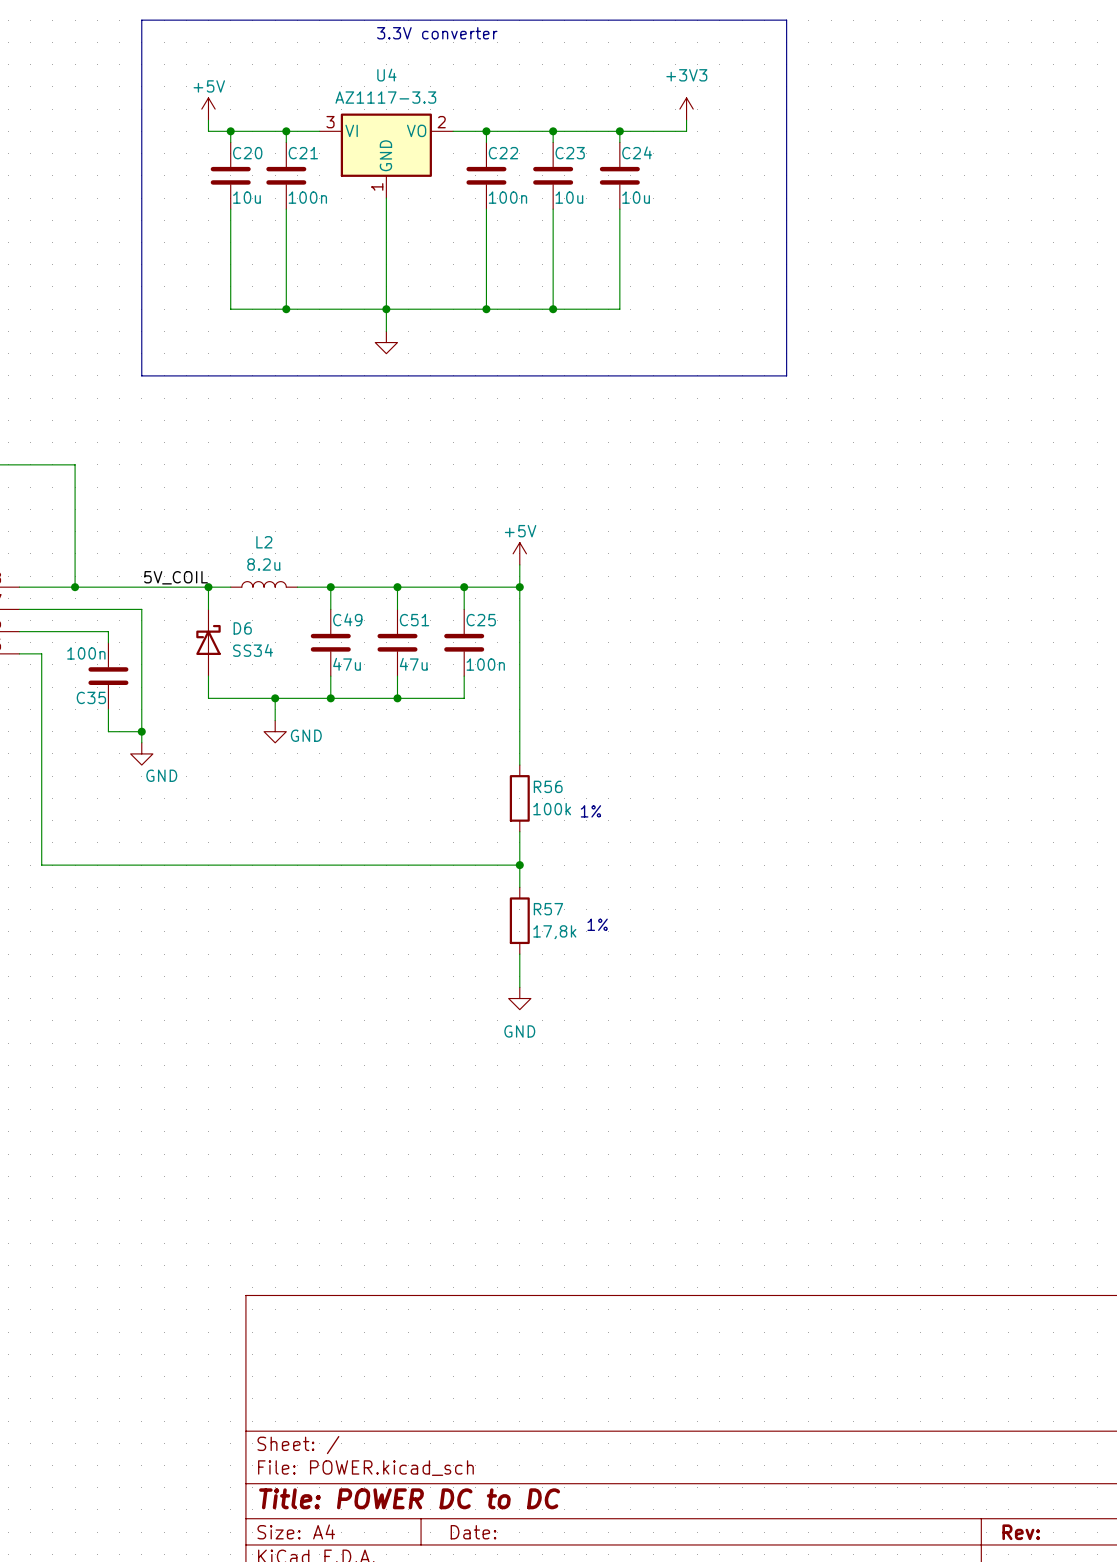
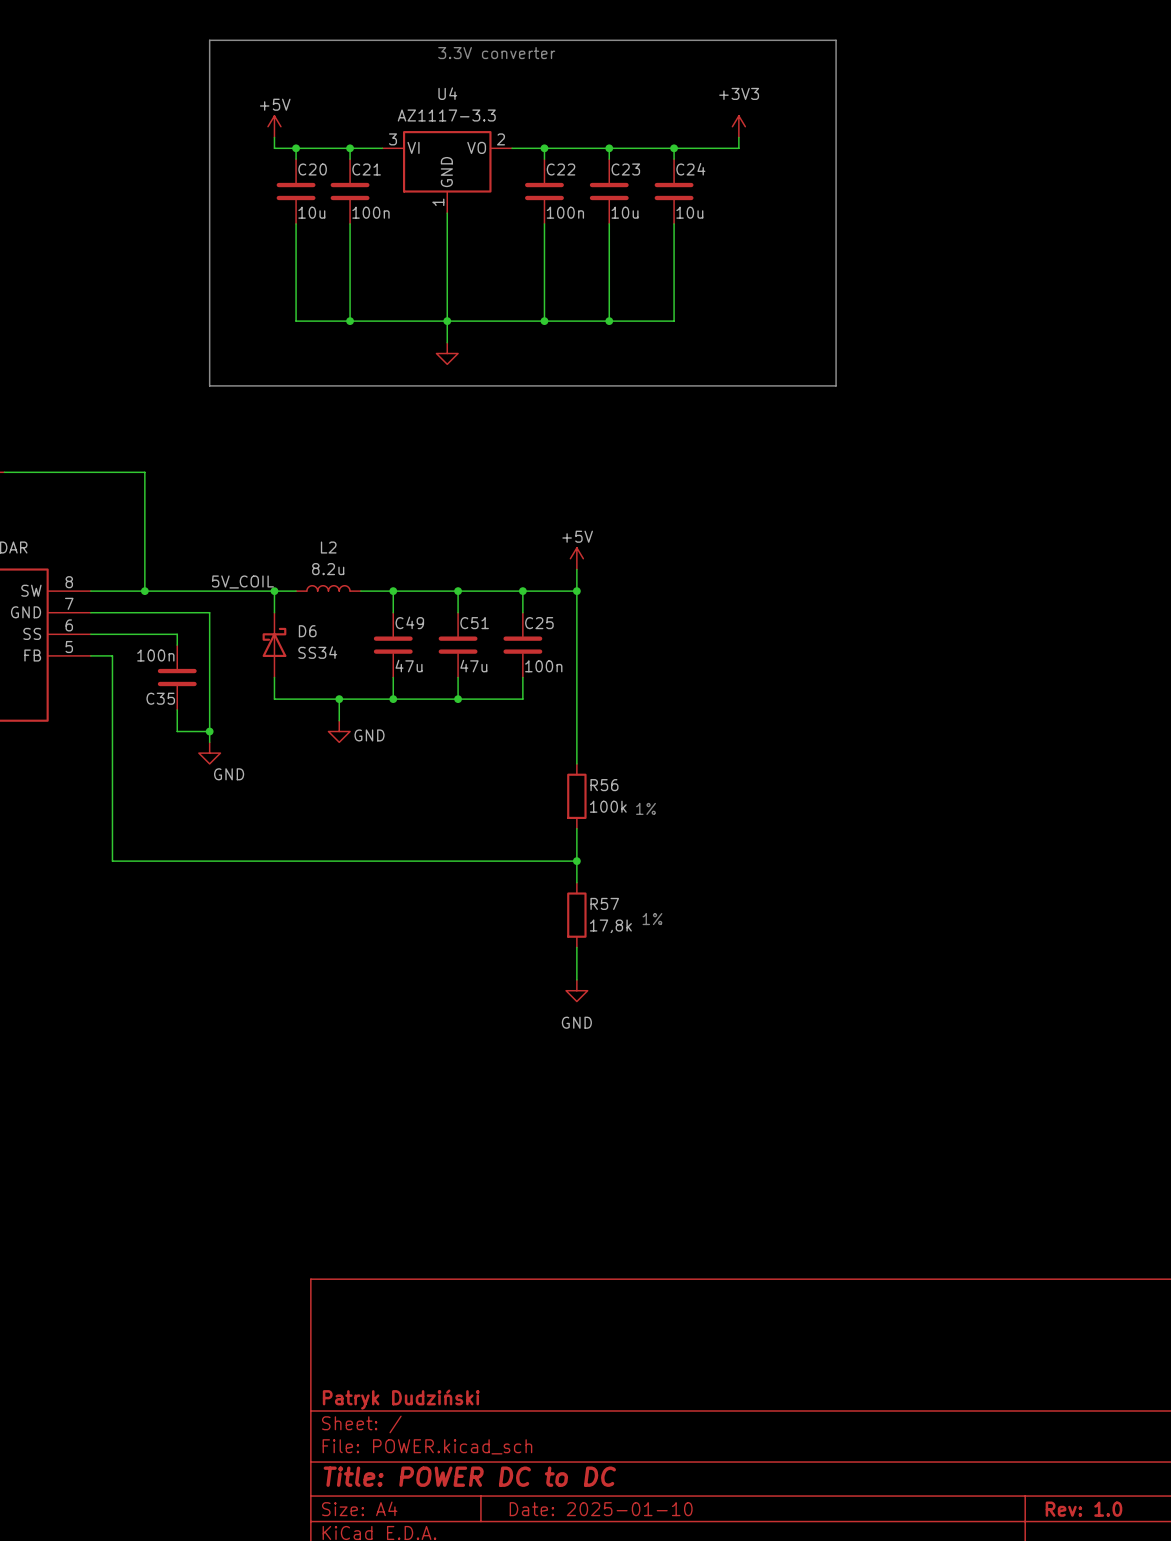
title block: none -> Patryk Dudziński (401, 1399)
title block: Date: (473, 1532) -> Date: 2025-01-10 (601, 1509)
title block: Rev: (1021, 1532) -> Rev: 1.0 (1083, 1509)

